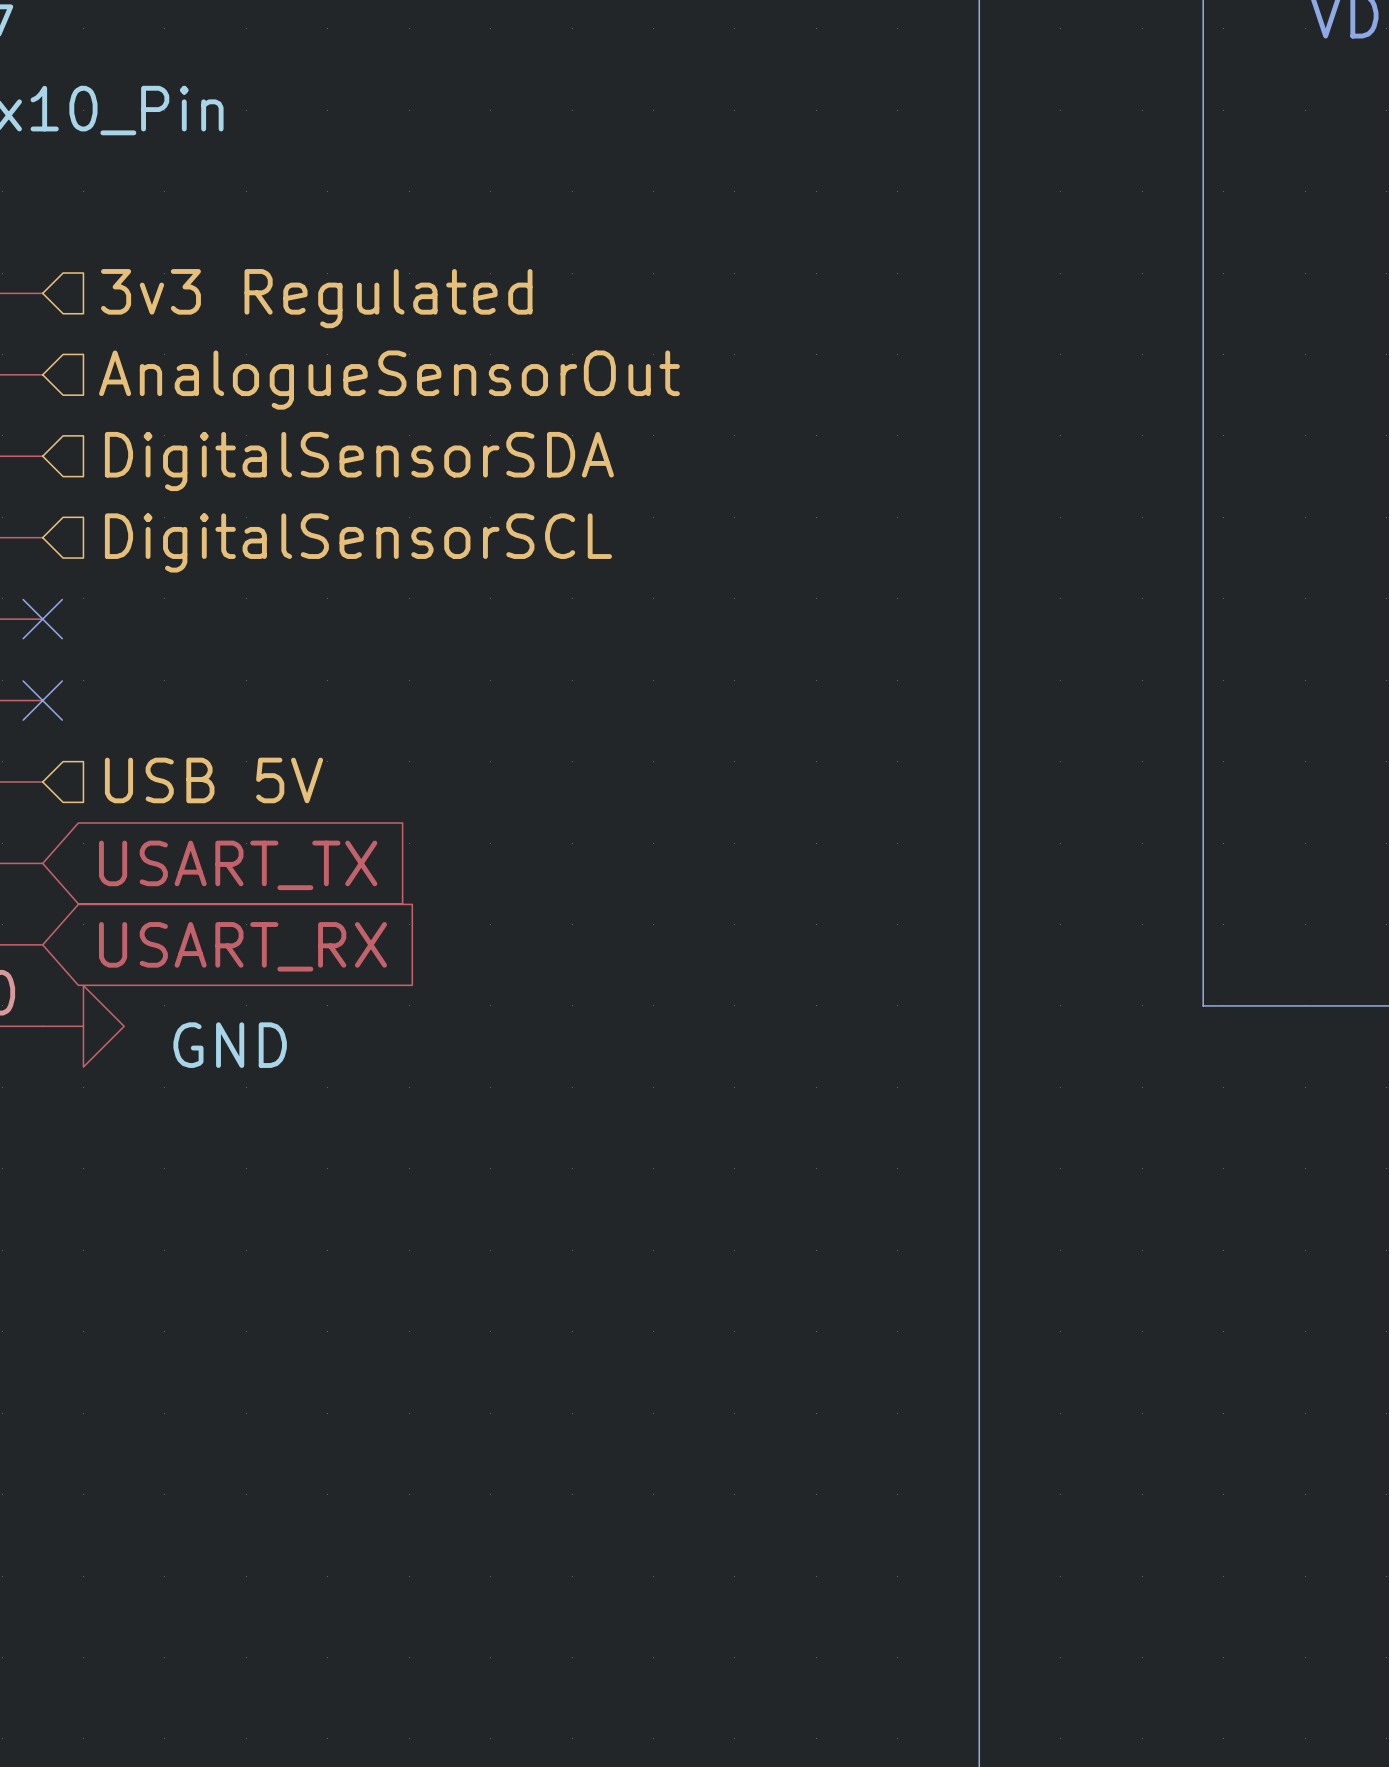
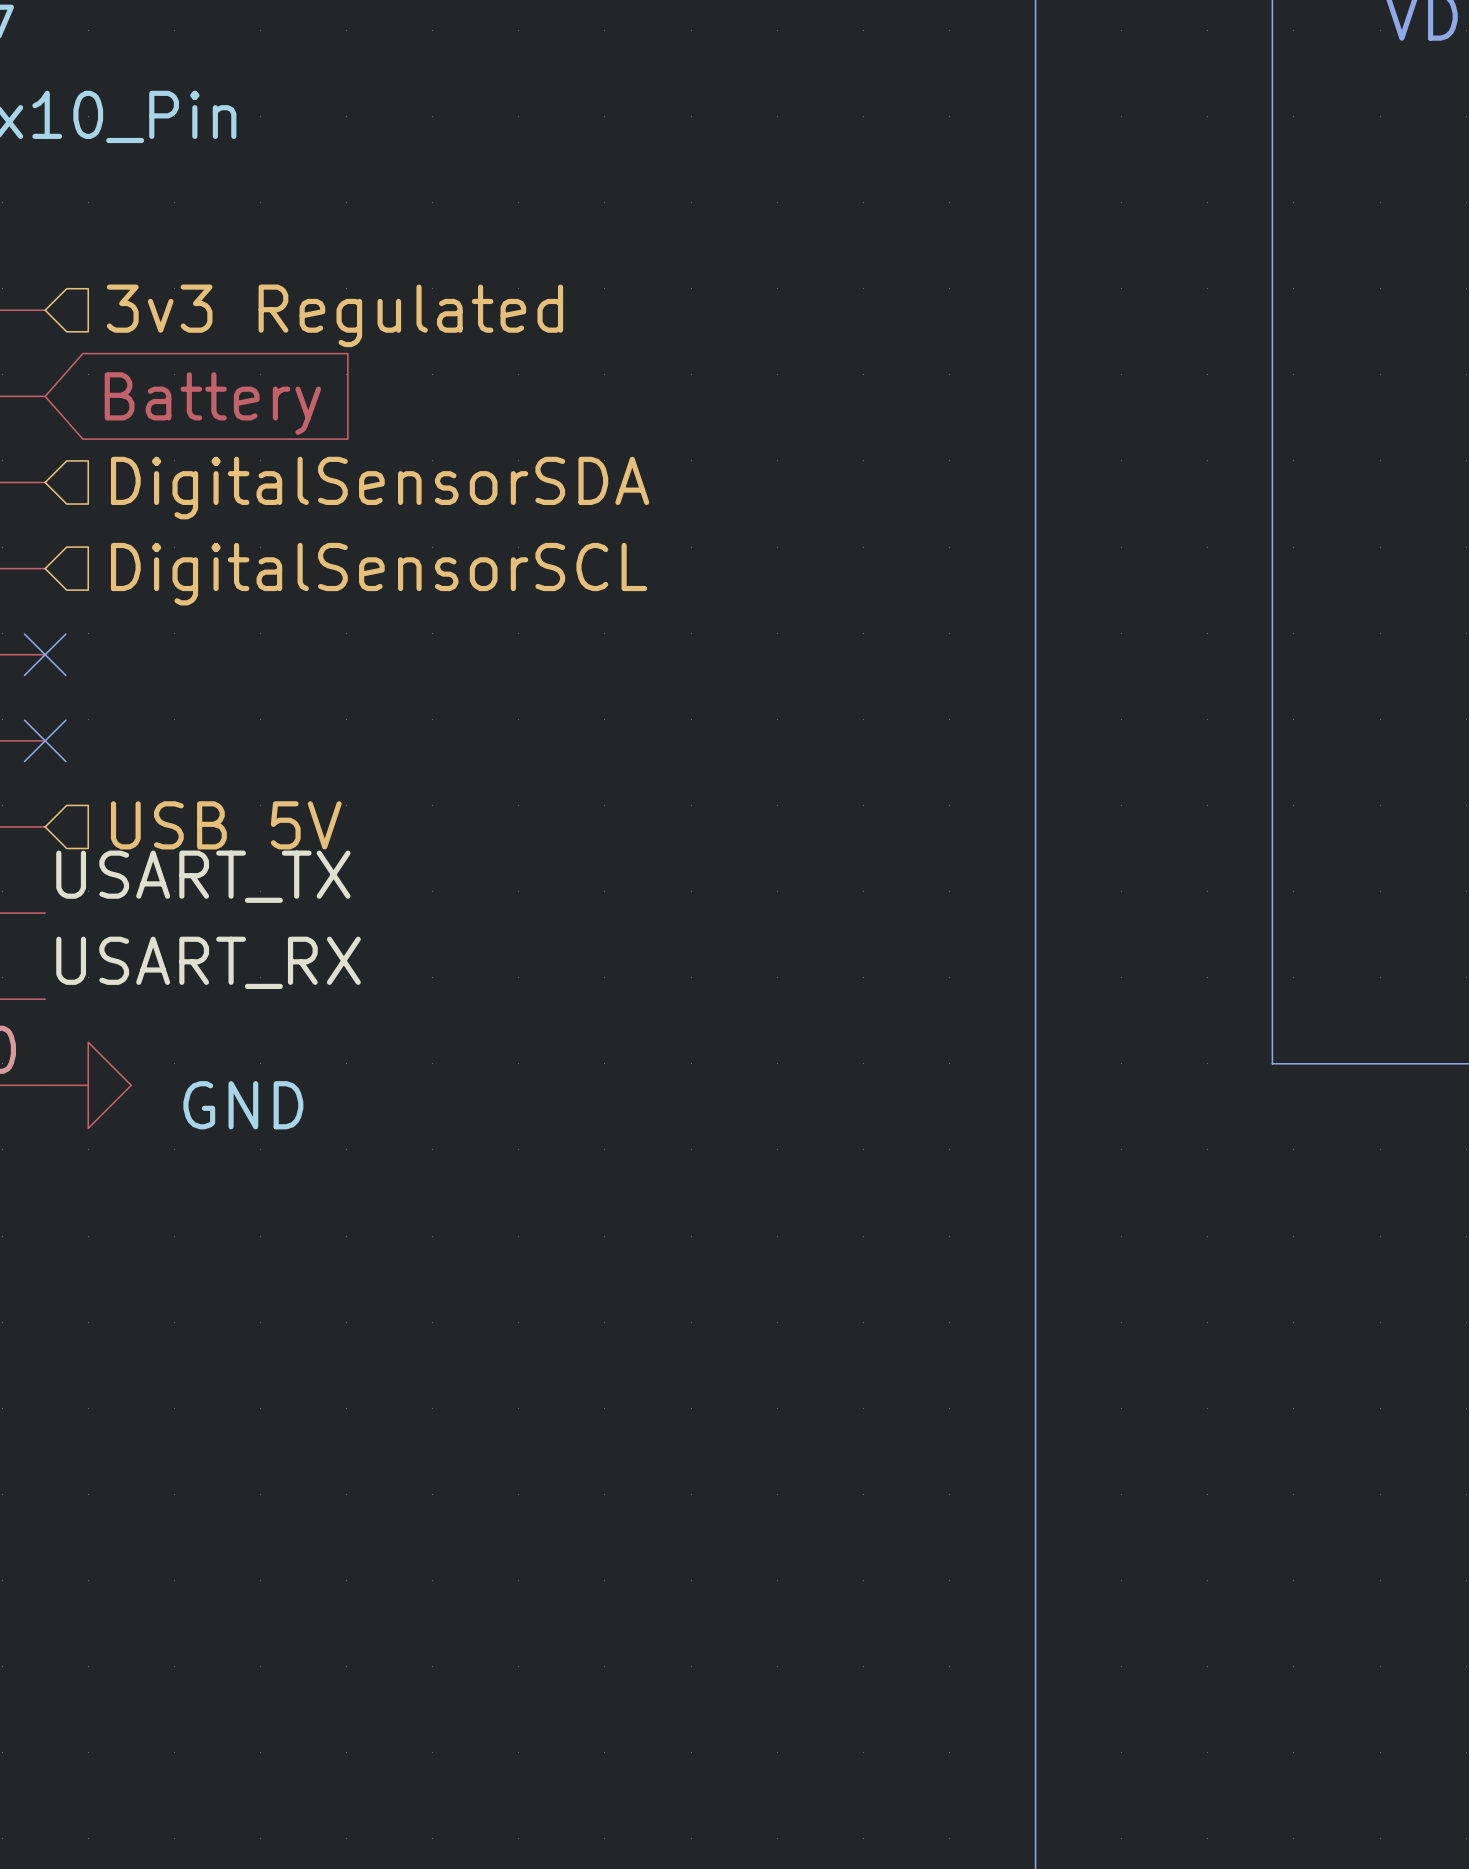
hierarchical label: AnalogueSensorOut (389, 380) -> none
global label: none -> Battery (212, 403)
label: none -> USART_TX (203, 876)
global label: USART_TX (238, 865) -> none
label: none -> USART_RX (208, 962)
global label: USART_RX (242, 946) -> none

